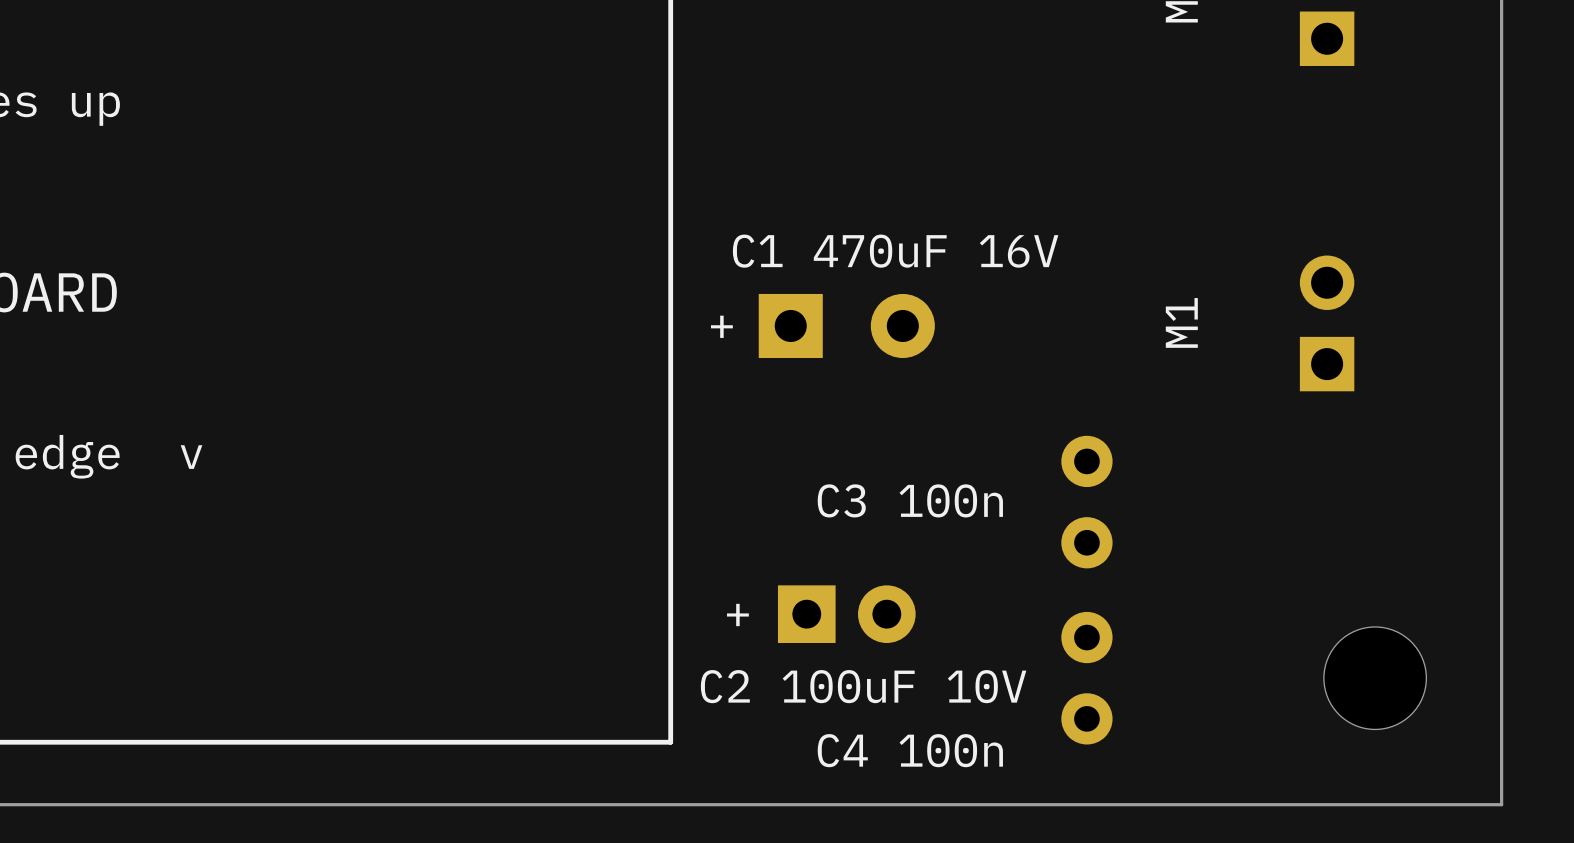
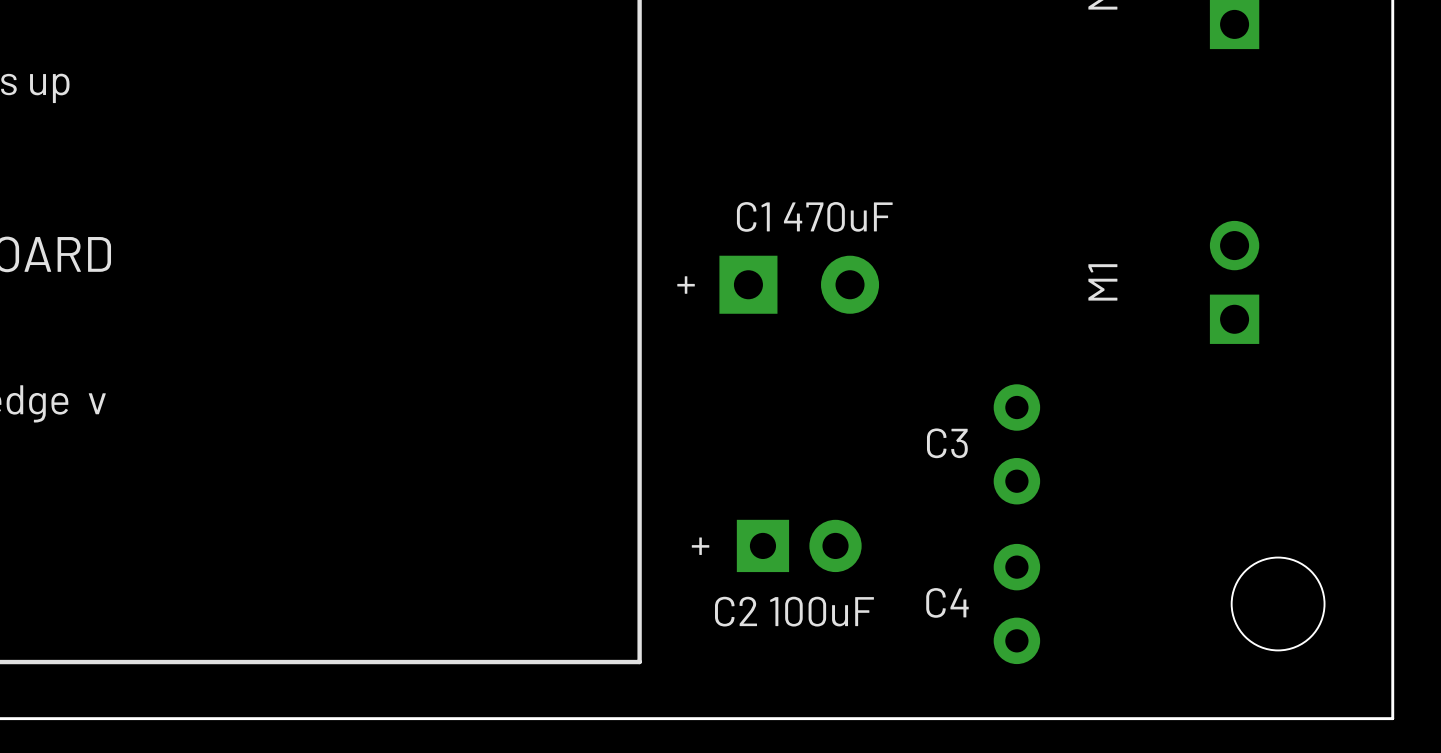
text: C1 470uF 16V (895, 251) -> C1 470uF (814, 216)
text: C3 100n (910, 500) -> none
text: none -> C3 (947, 443)
text: none -> C4 (947, 602)
text: C2 100uF 10V (863, 686) -> C2 100uF (794, 611)
text: C4 100n (910, 750) -> none

